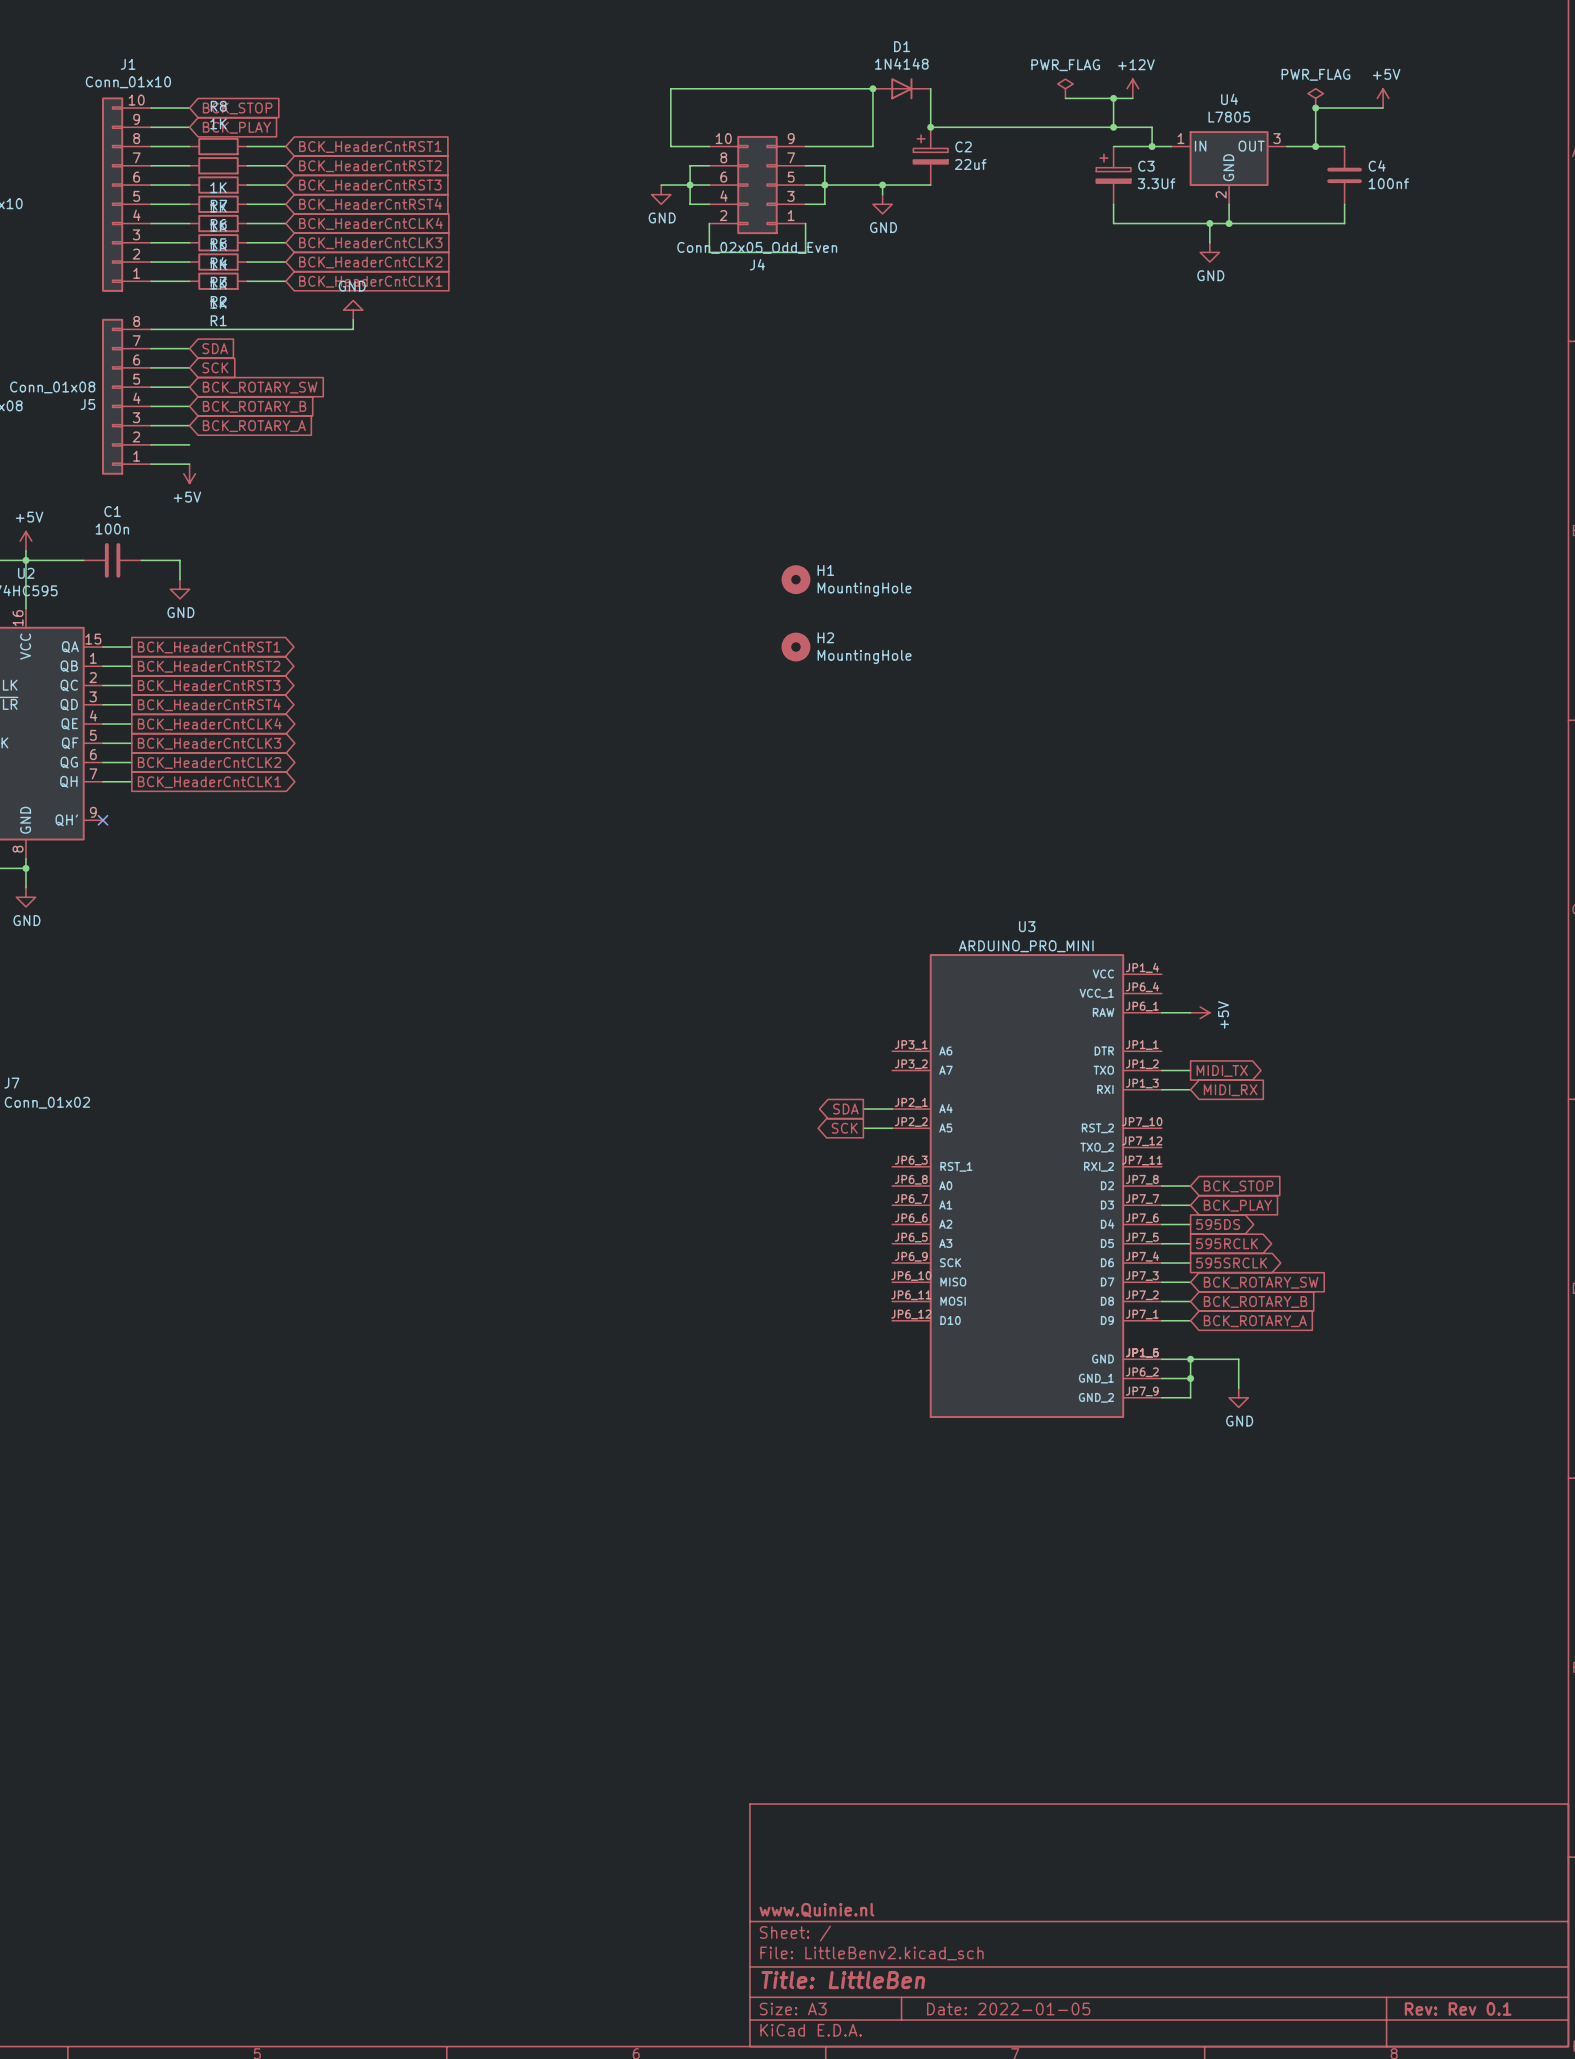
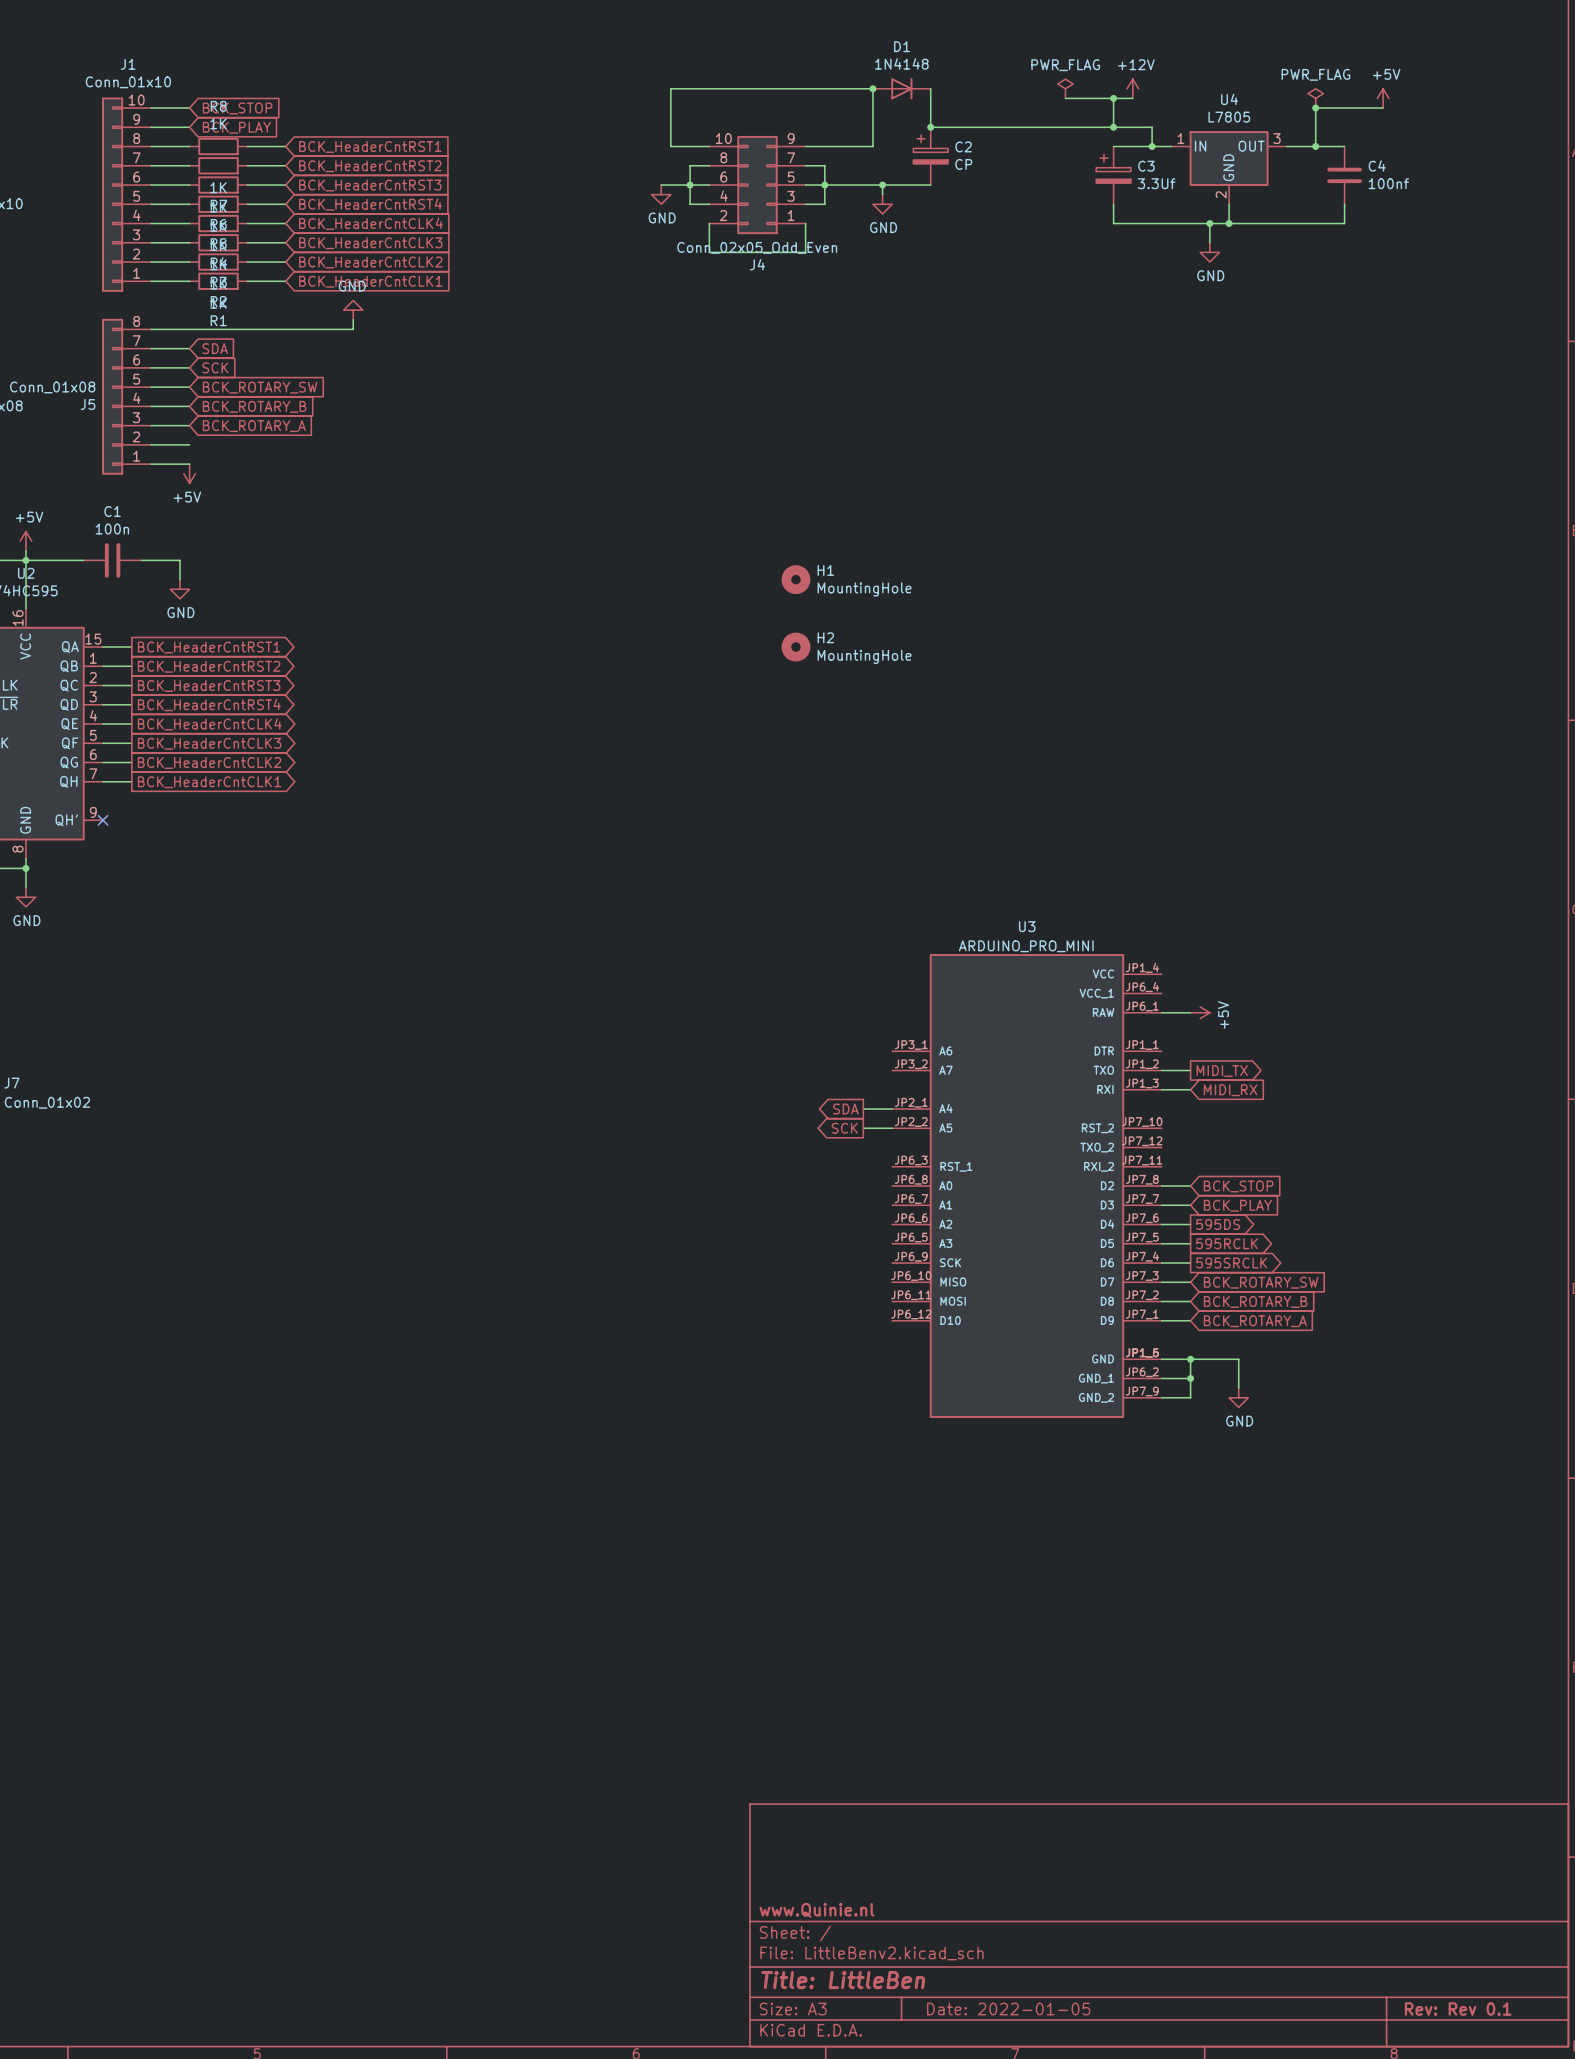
C2 value: 22uf (970, 164) -> CP (963, 164)

